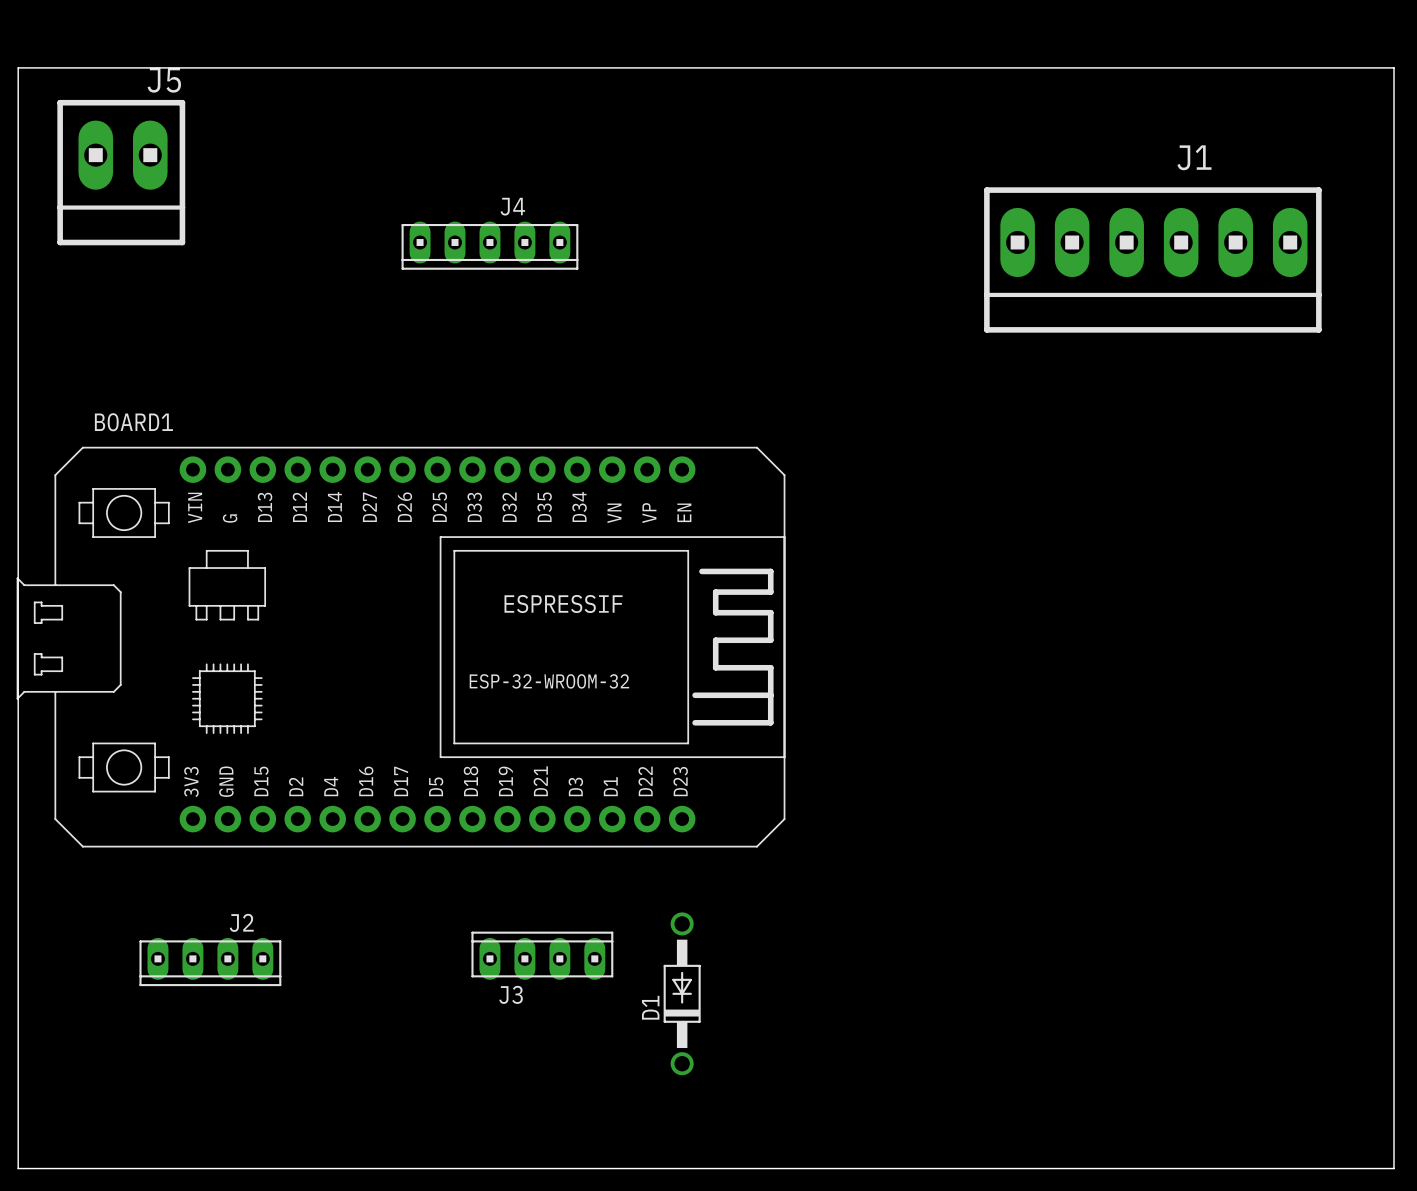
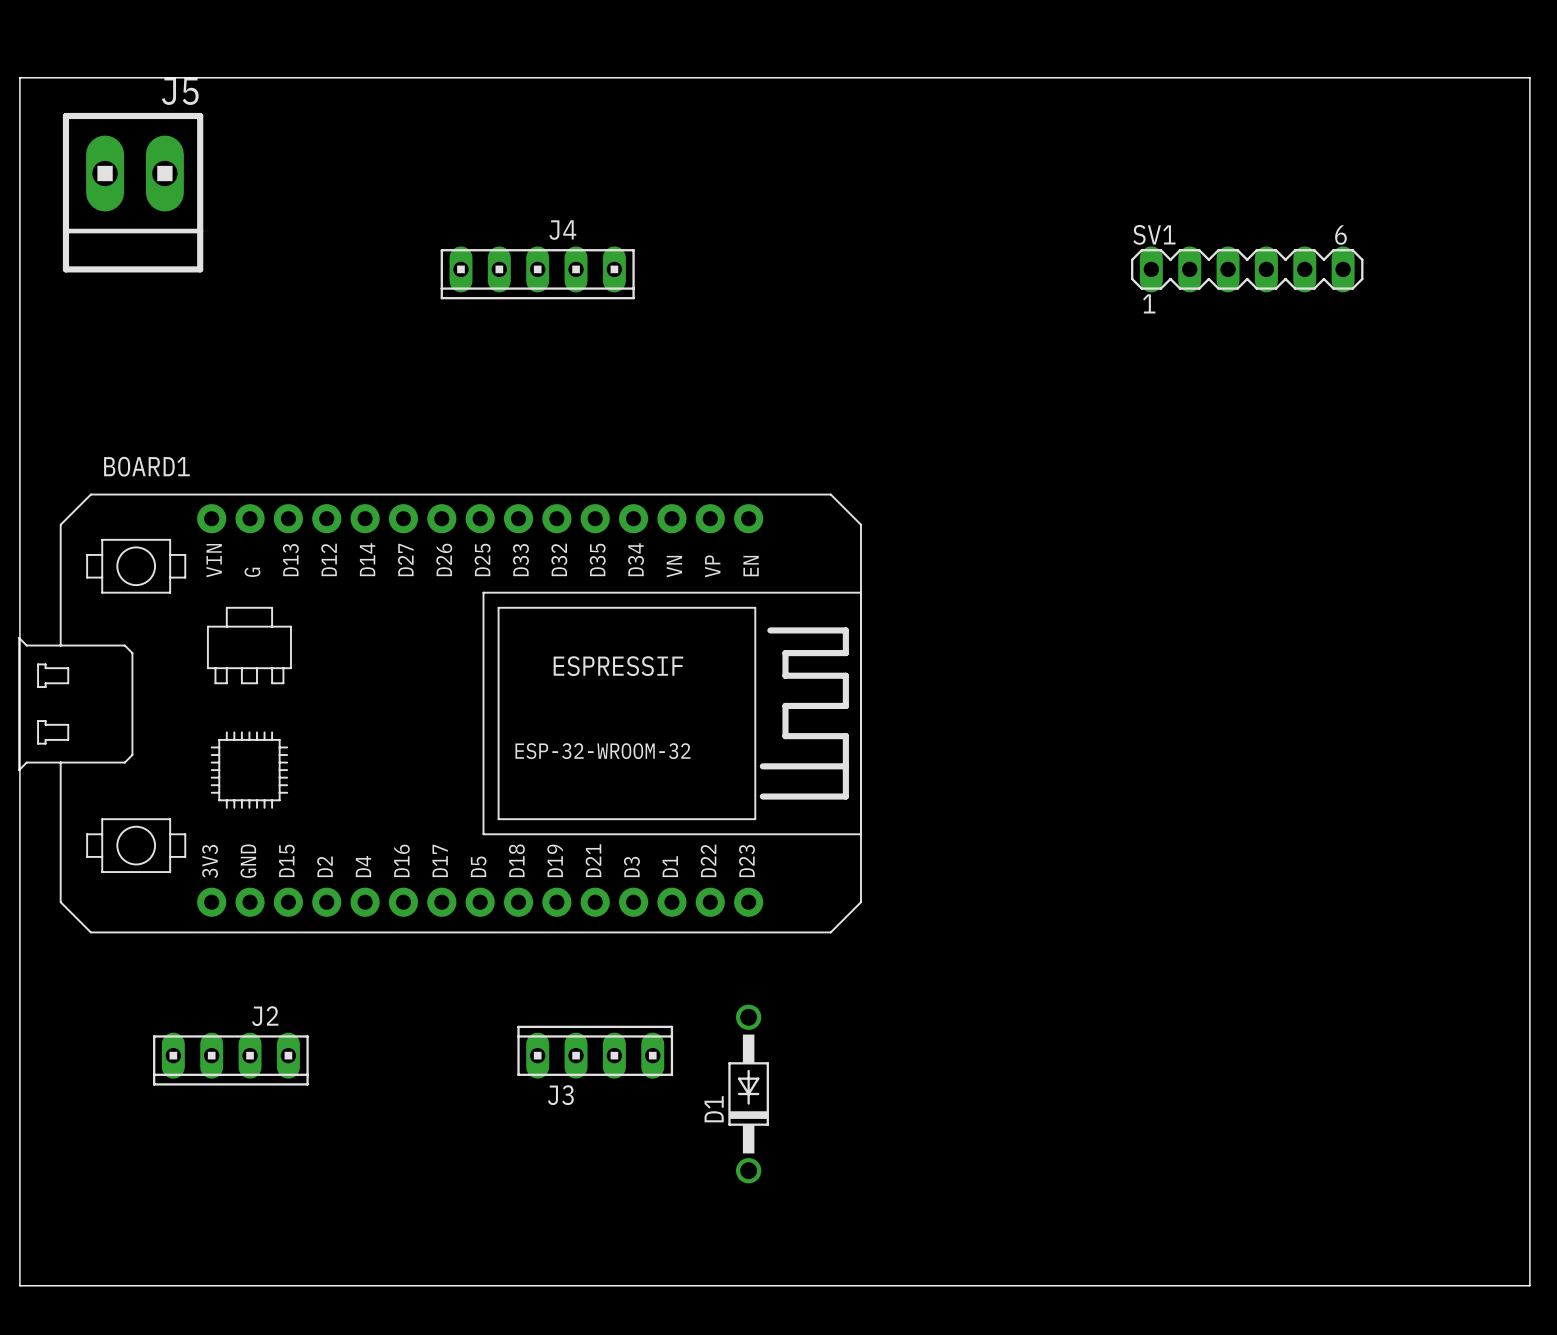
SV1: none -> (1247, 269)
J1: (1152, 259) -> none

